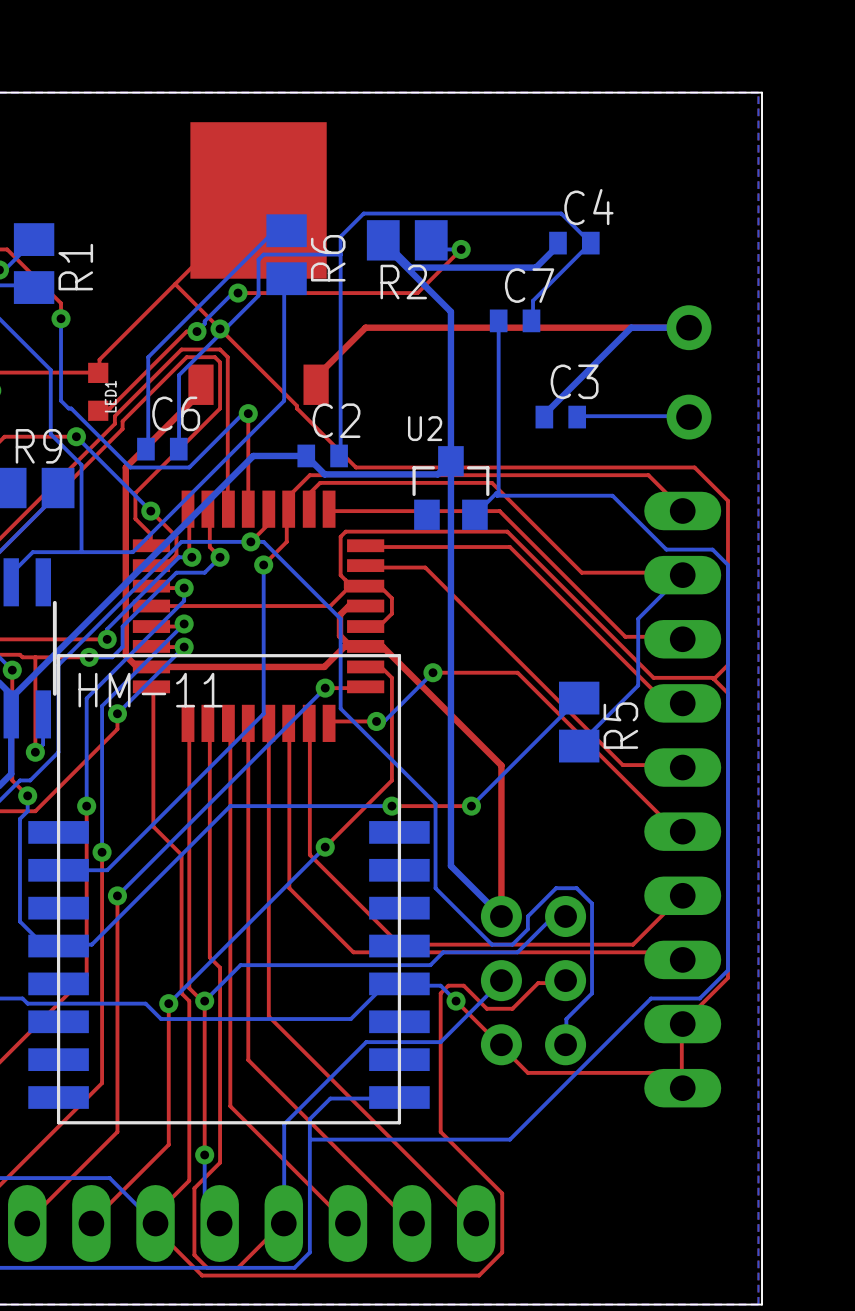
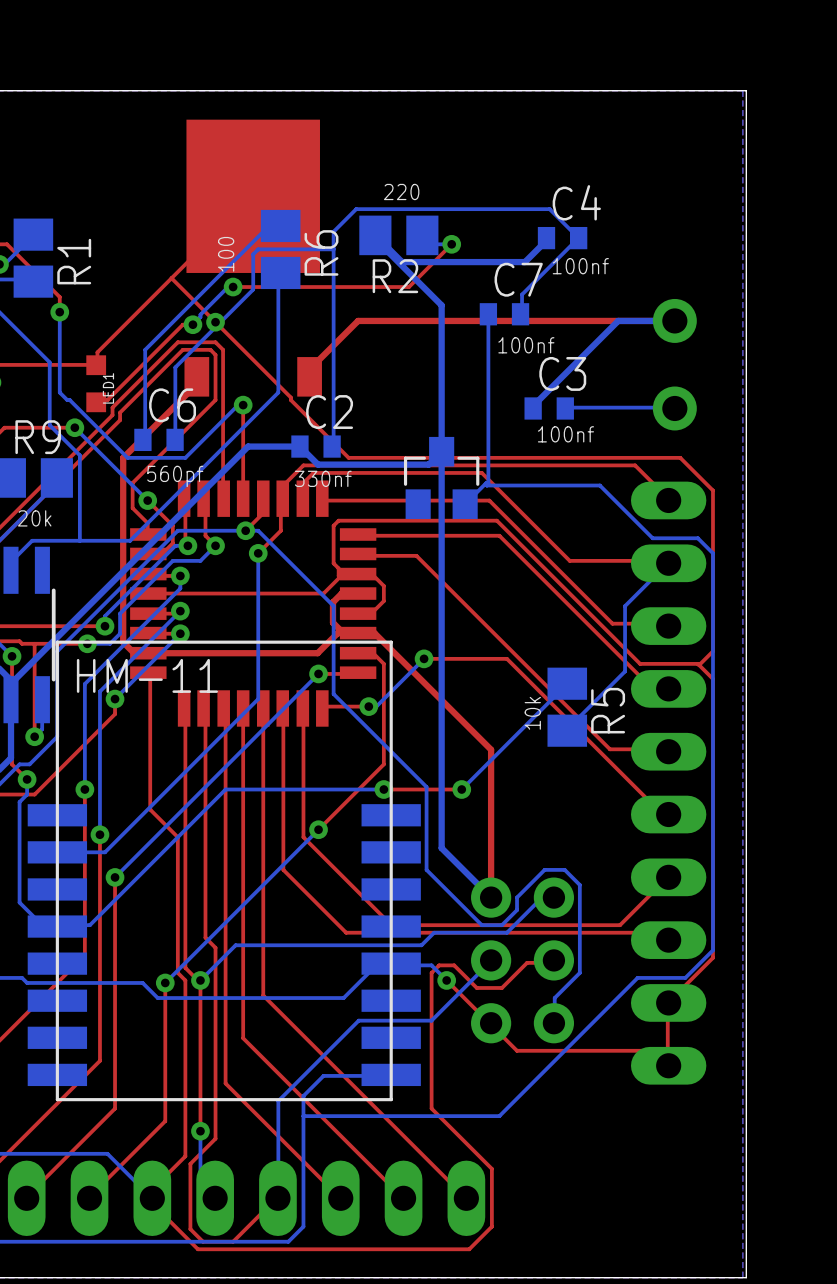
text: none -> 220 (401, 191)
text: none -> 100 (226, 254)
text: none -> 100nf (580, 266)
text: none -> 100nf (526, 345)
U2 name: U2 (425, 428) -> none
text: none -> 100nf (565, 434)
text: none -> 560pf (175, 476)
text: none -> 330nf (323, 478)
text: none -> 20k (34, 518)
text: none -> 10k (532, 713)

